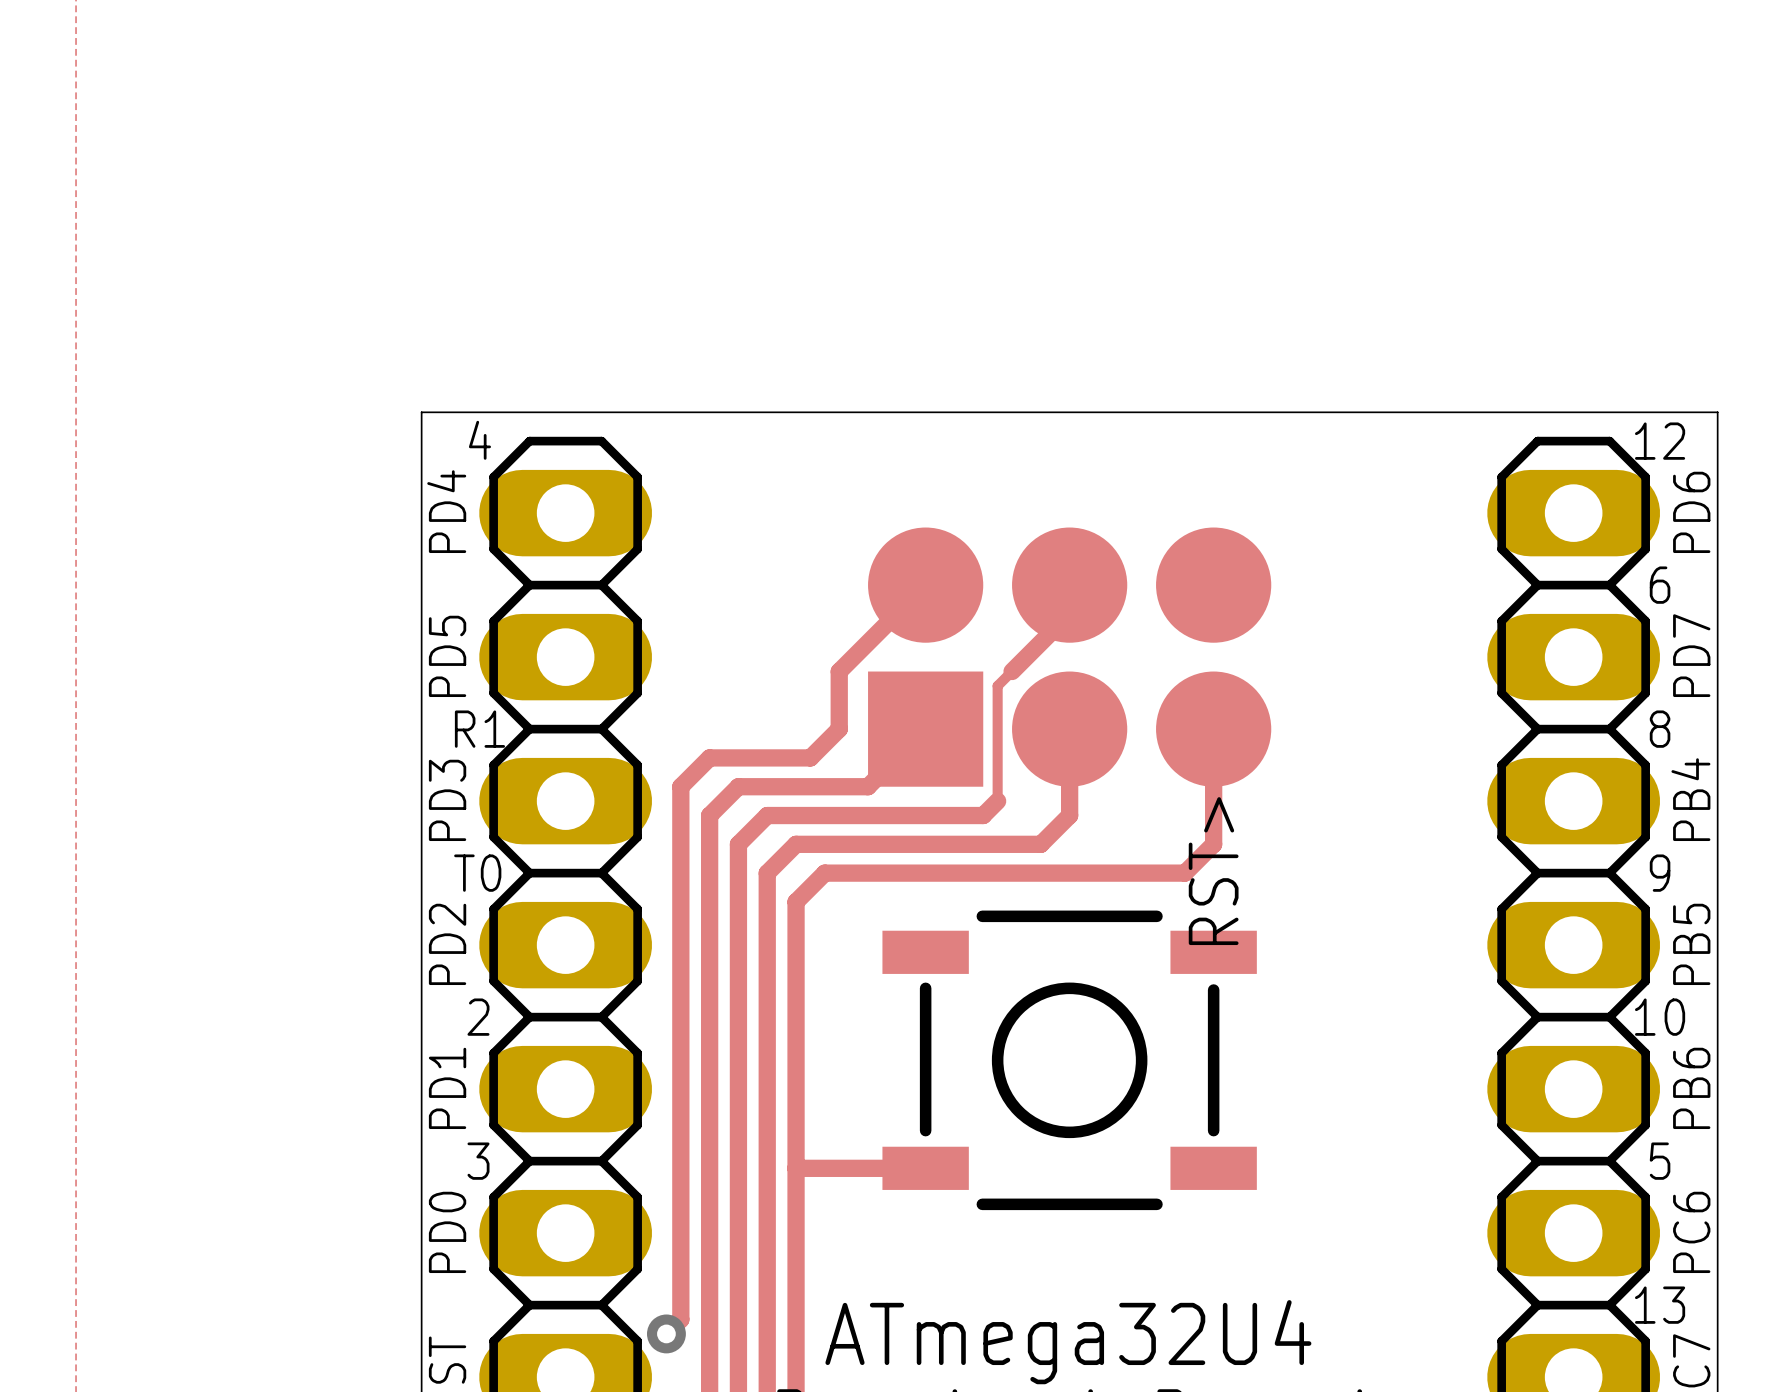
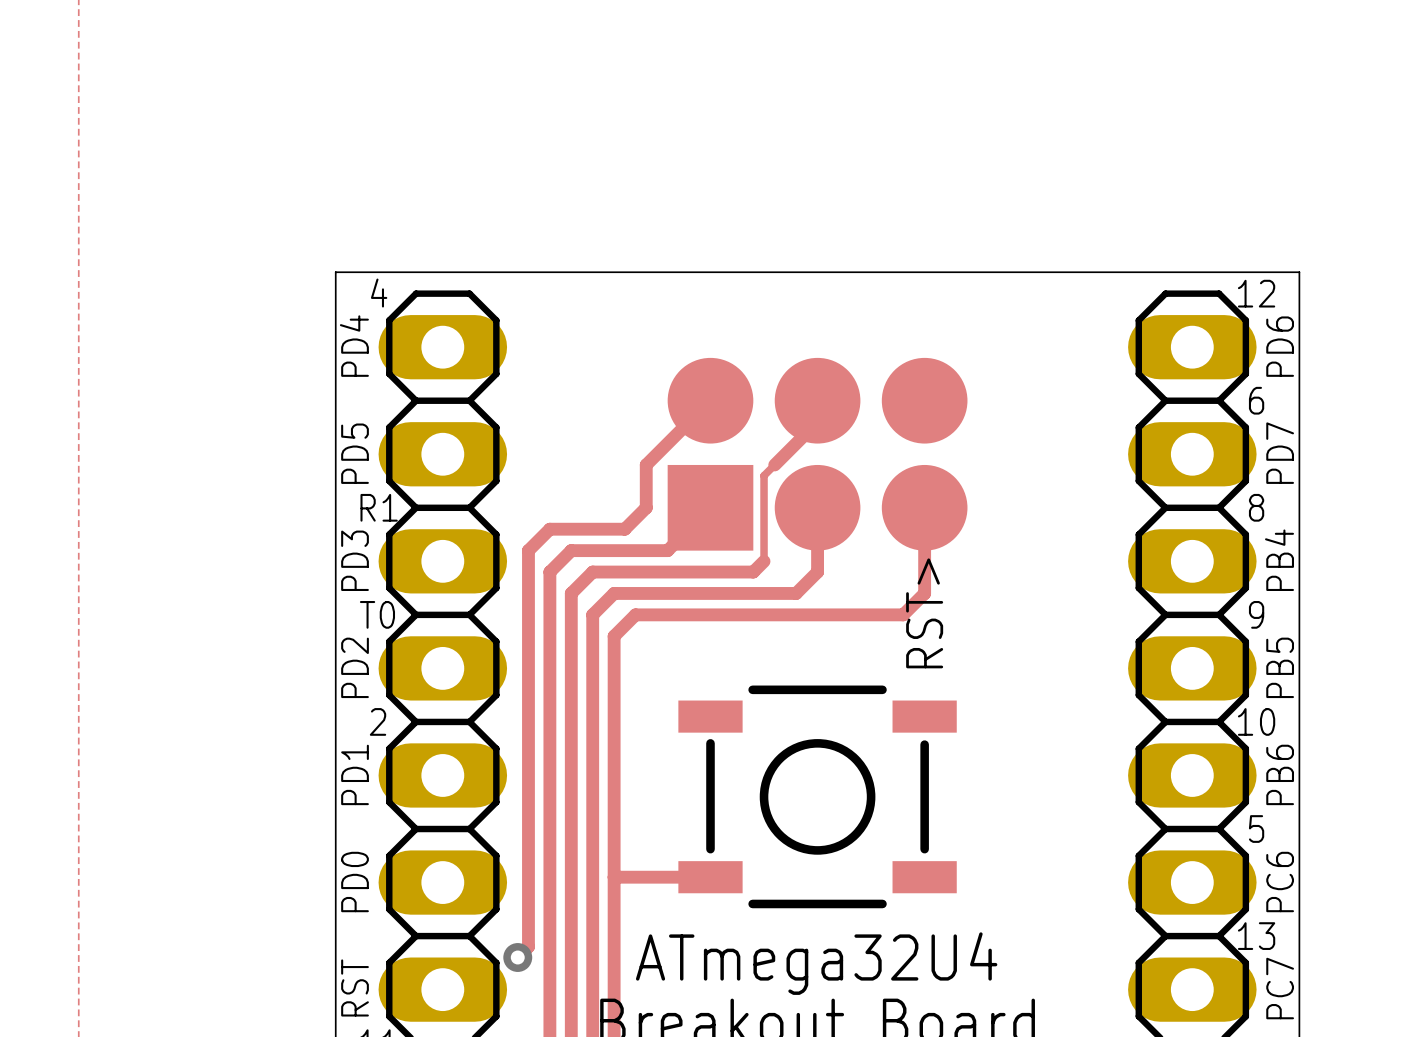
part position: (1069, 1060) -> (817, 796)
text: 3 (478, 1161) -> none
track: (796, 1168) (925, 1168) -> (614, 877) (710, 877)

